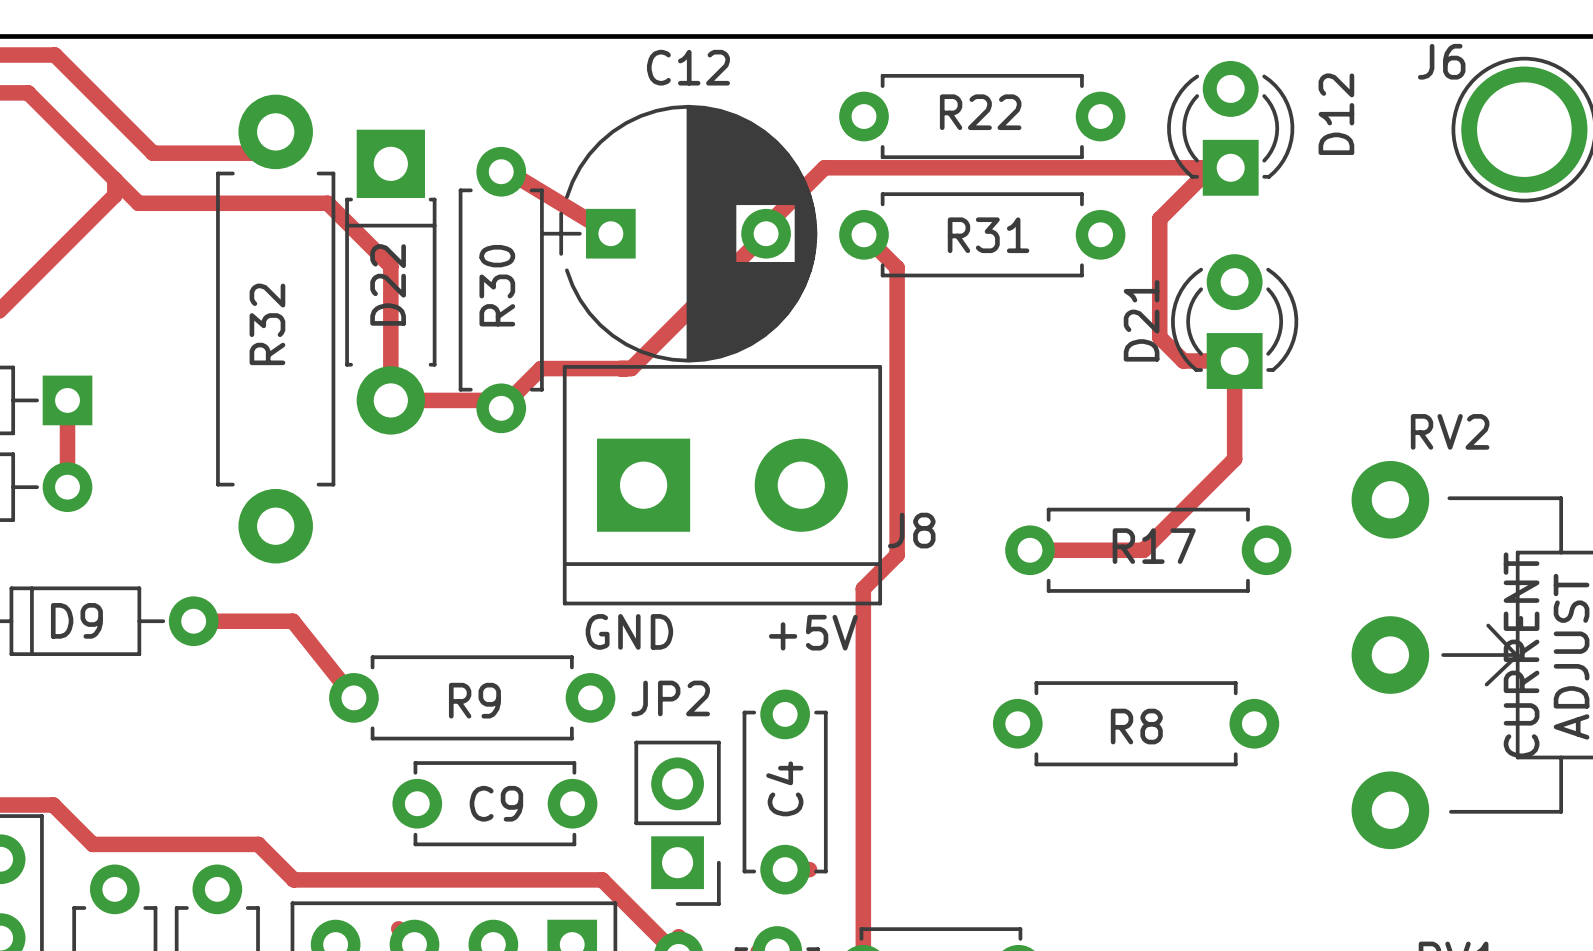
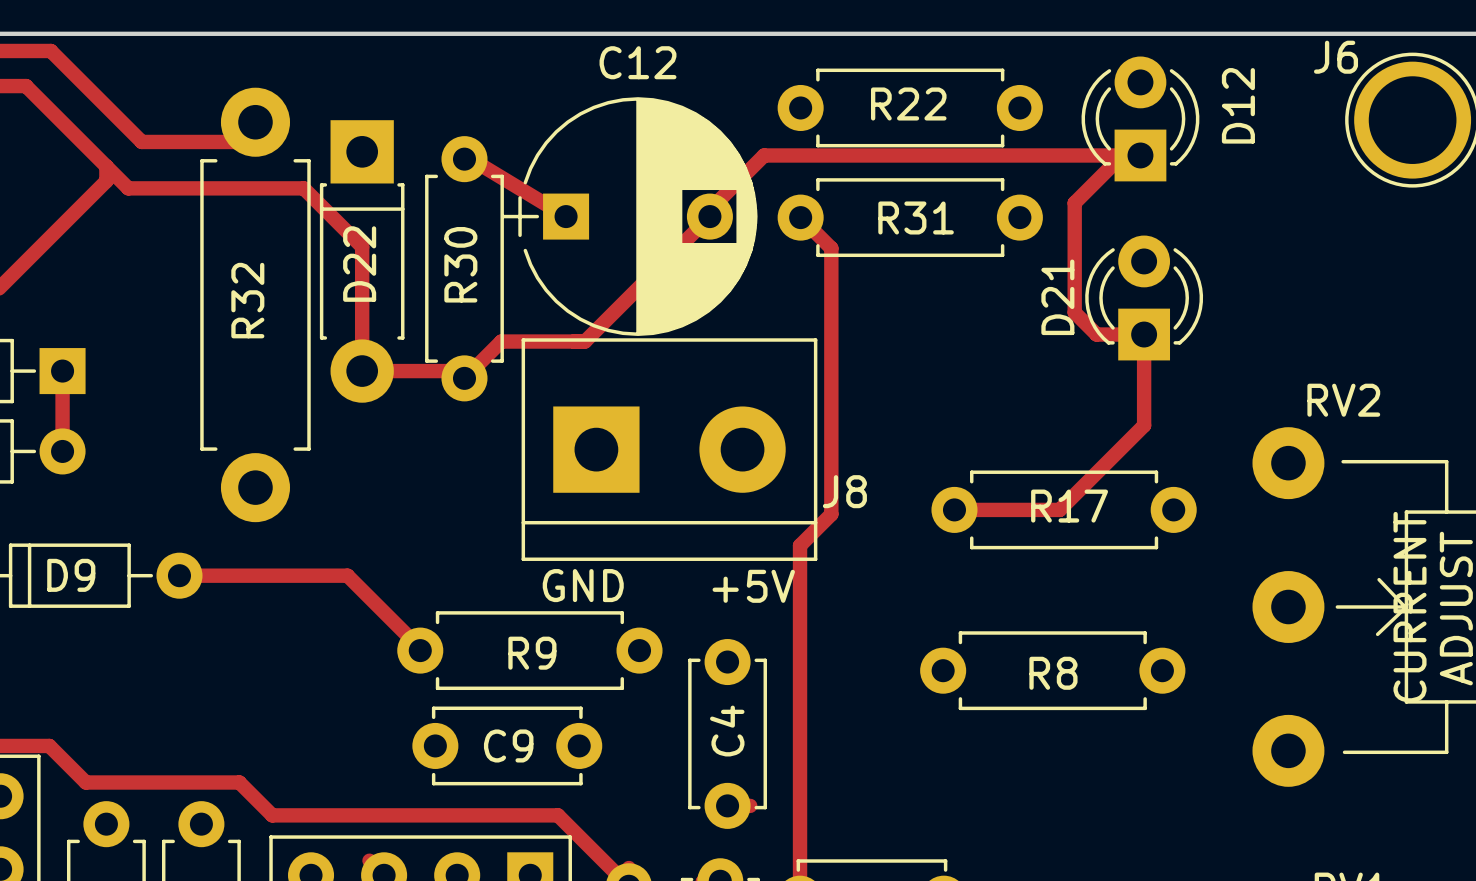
track: (292, 621) (353, 697) -> (271, 575) (347, 575) (420, 648) (420, 656)
R9 position: (472, 697) -> (529, 650)
C9 position: (494, 803) -> (507, 745)
JP2: (677, 823) -> none

